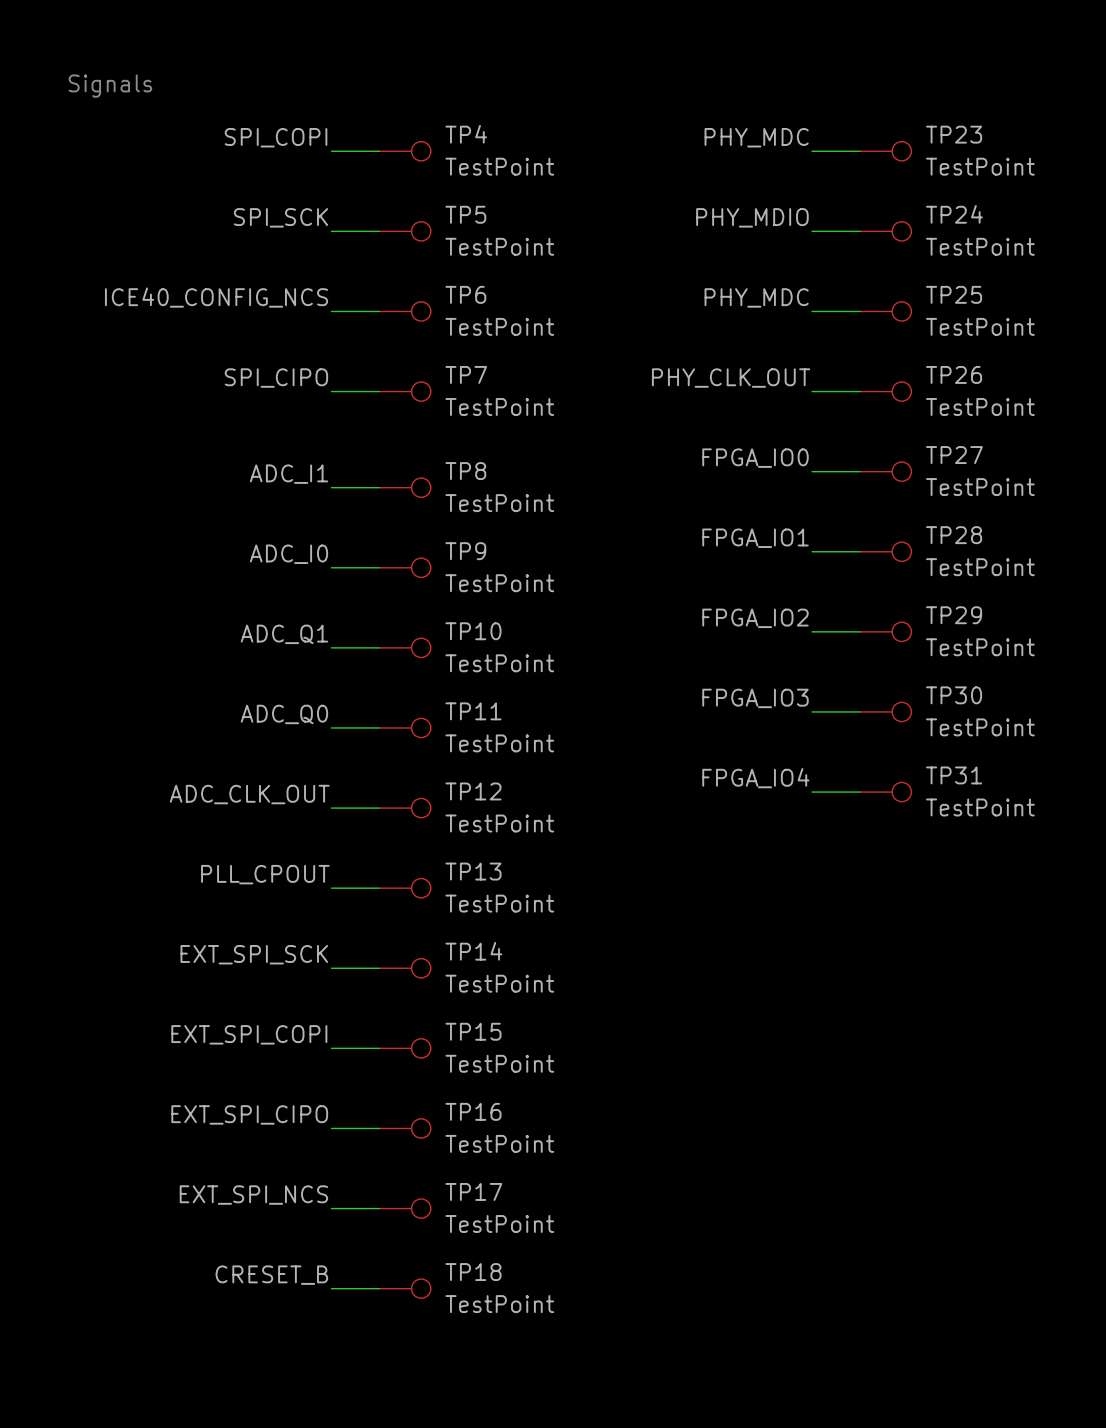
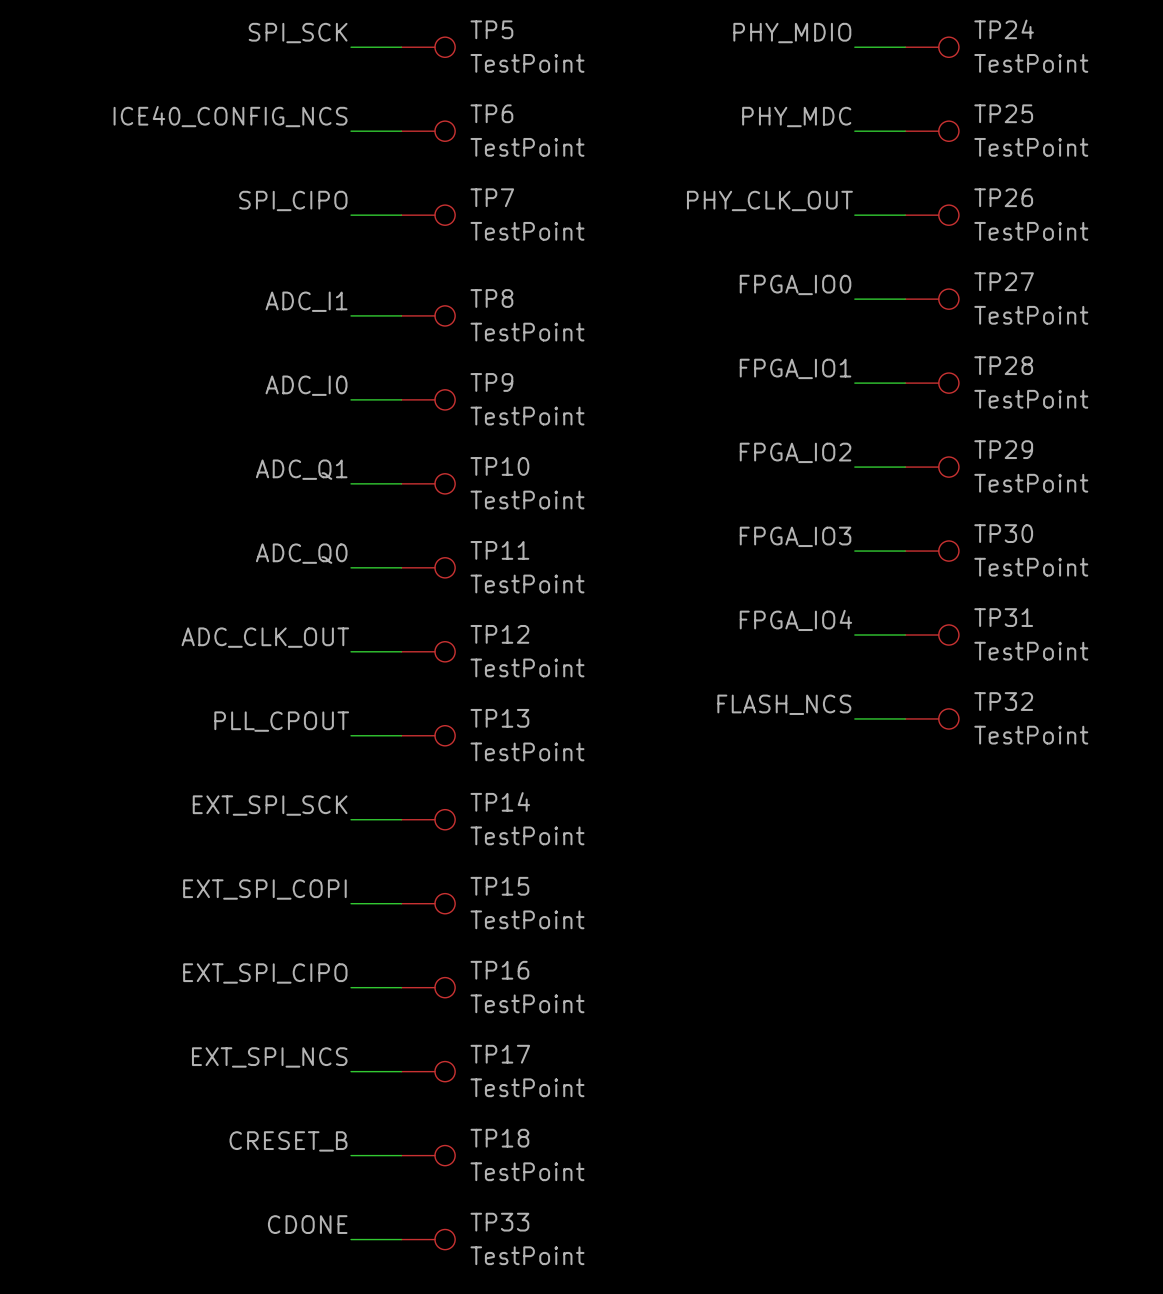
label: none -> FLASH_NCS (784, 704)
wire: none -> (854, 718) (905, 718)
TP32: none -> TestPoint (932, 718)
label: none -> CDONE (307, 1224)
wire: none -> (351, 1239) (401, 1239)
TP33: none -> TestPoint (428, 1239)

